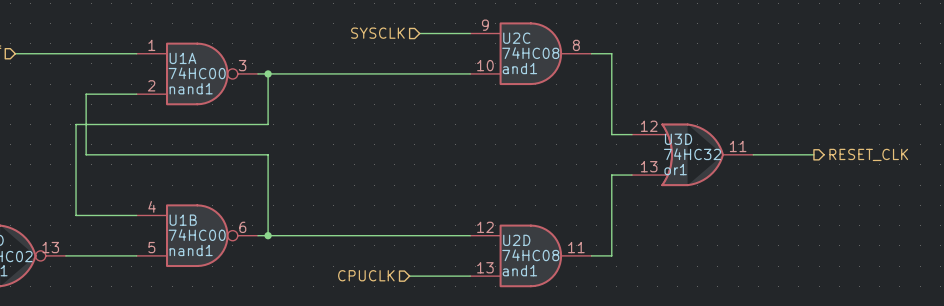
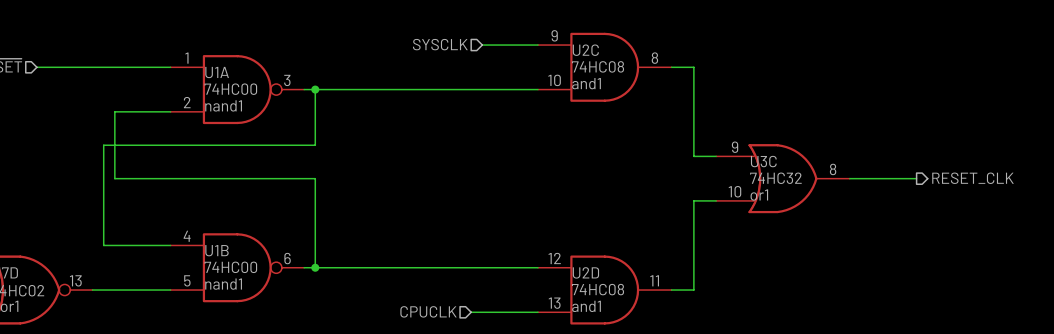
U3D pin number: 12 (649, 126) -> 9 (735, 147)
U3D name: U3D (678, 139) -> U3C (763, 161)
U3D pin number: 11 (738, 146) -> 8 (833, 169)
U3D pin number: 13 (649, 166) -> 10 (734, 191)

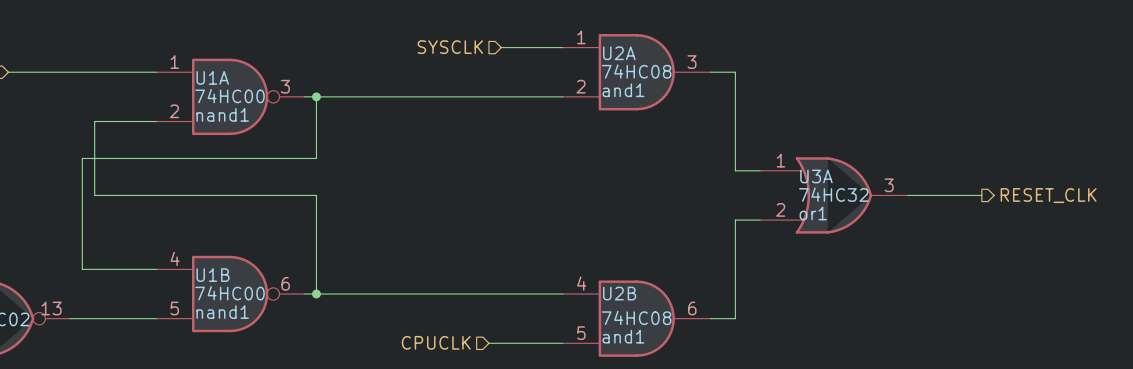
U2C pin number: 9 (554, 35) -> 1 (581, 37)
U2C name: U2C (585, 50) -> U2A (619, 53)
U2C pin number: 8 (654, 58) -> 3 (691, 62)
U2C pin number: 10 (554, 80) -> 2 (581, 86)
U3C pin number: 9 (735, 147) -> 1 (780, 160)
U3C name: U3C (763, 161) -> U3A (816, 176)
U3C pin number: 8 (833, 169) -> 3 (889, 185)
U3C pin number: 10 (734, 191) -> 2 (780, 209)
U2D pin number: 12 (554, 258) -> 4 (581, 283)
U2D name: U2D (585, 272) -> U2B (619, 293)
U2D pin number: 11 (654, 280) -> 6 (692, 308)
U2D pin number: 13 (554, 303) -> 5 (581, 333)

